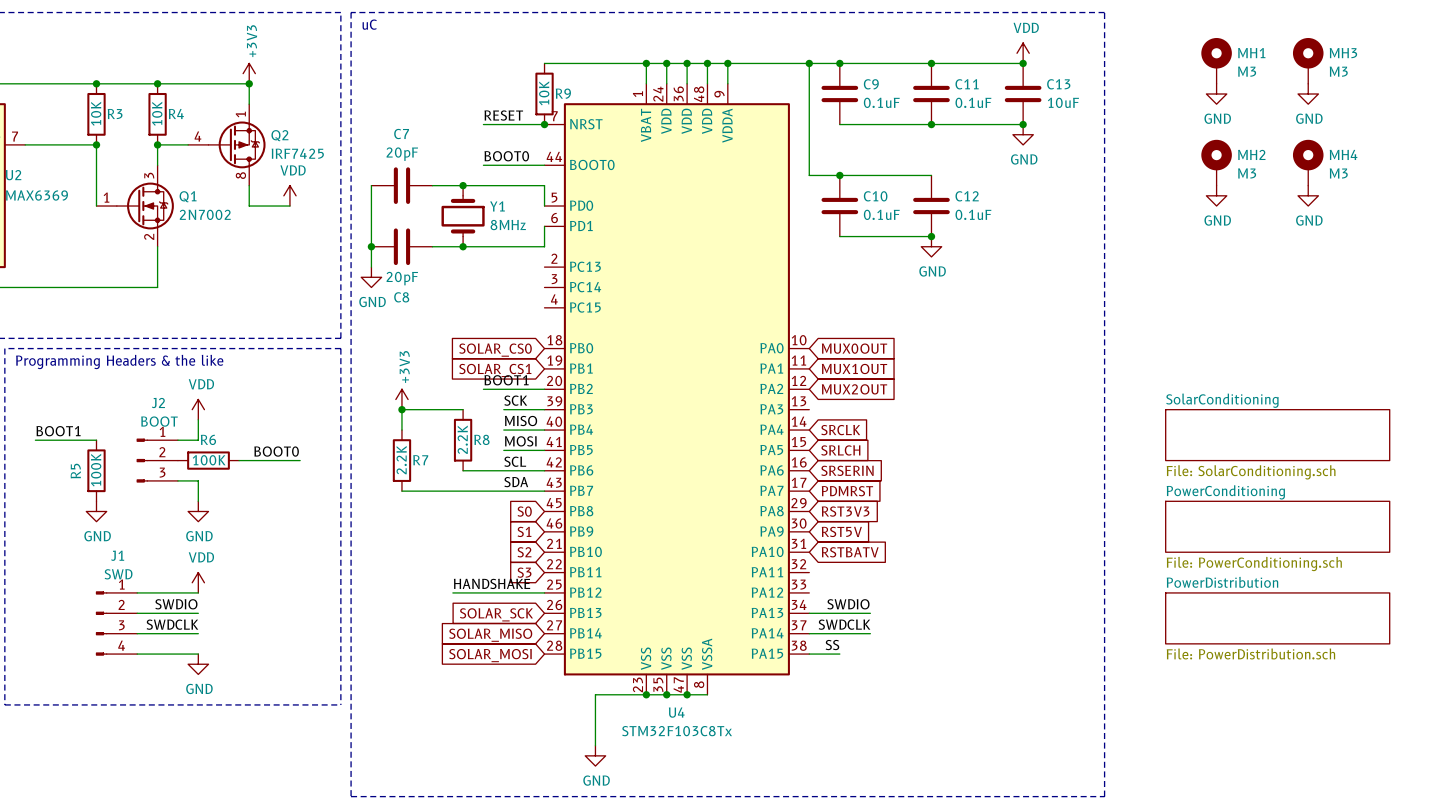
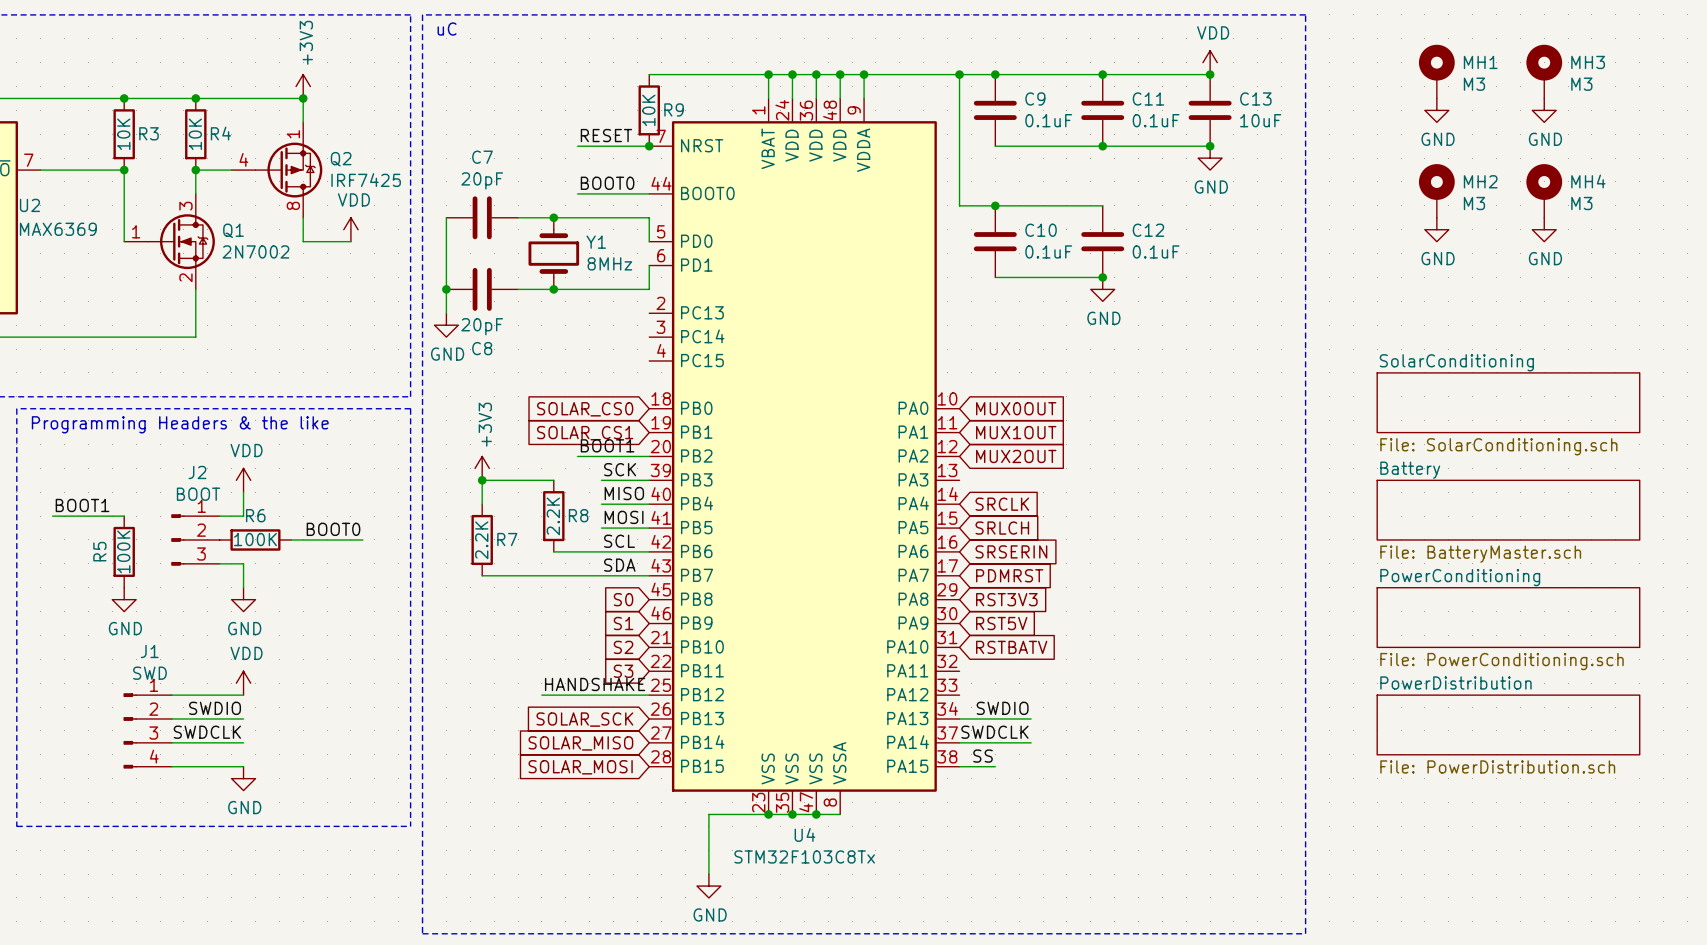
sheet SolarConditioning: none -> File: SolarConditioning.sch (1508, 402)
sheet SolarConditioning name: SolarConditioning (1222, 400) -> Battery (1410, 470)
sheet SolarConditioning value: File: SolarConditioning.sch (1251, 472) -> File: BatteryMaster.sch (1480, 554)

